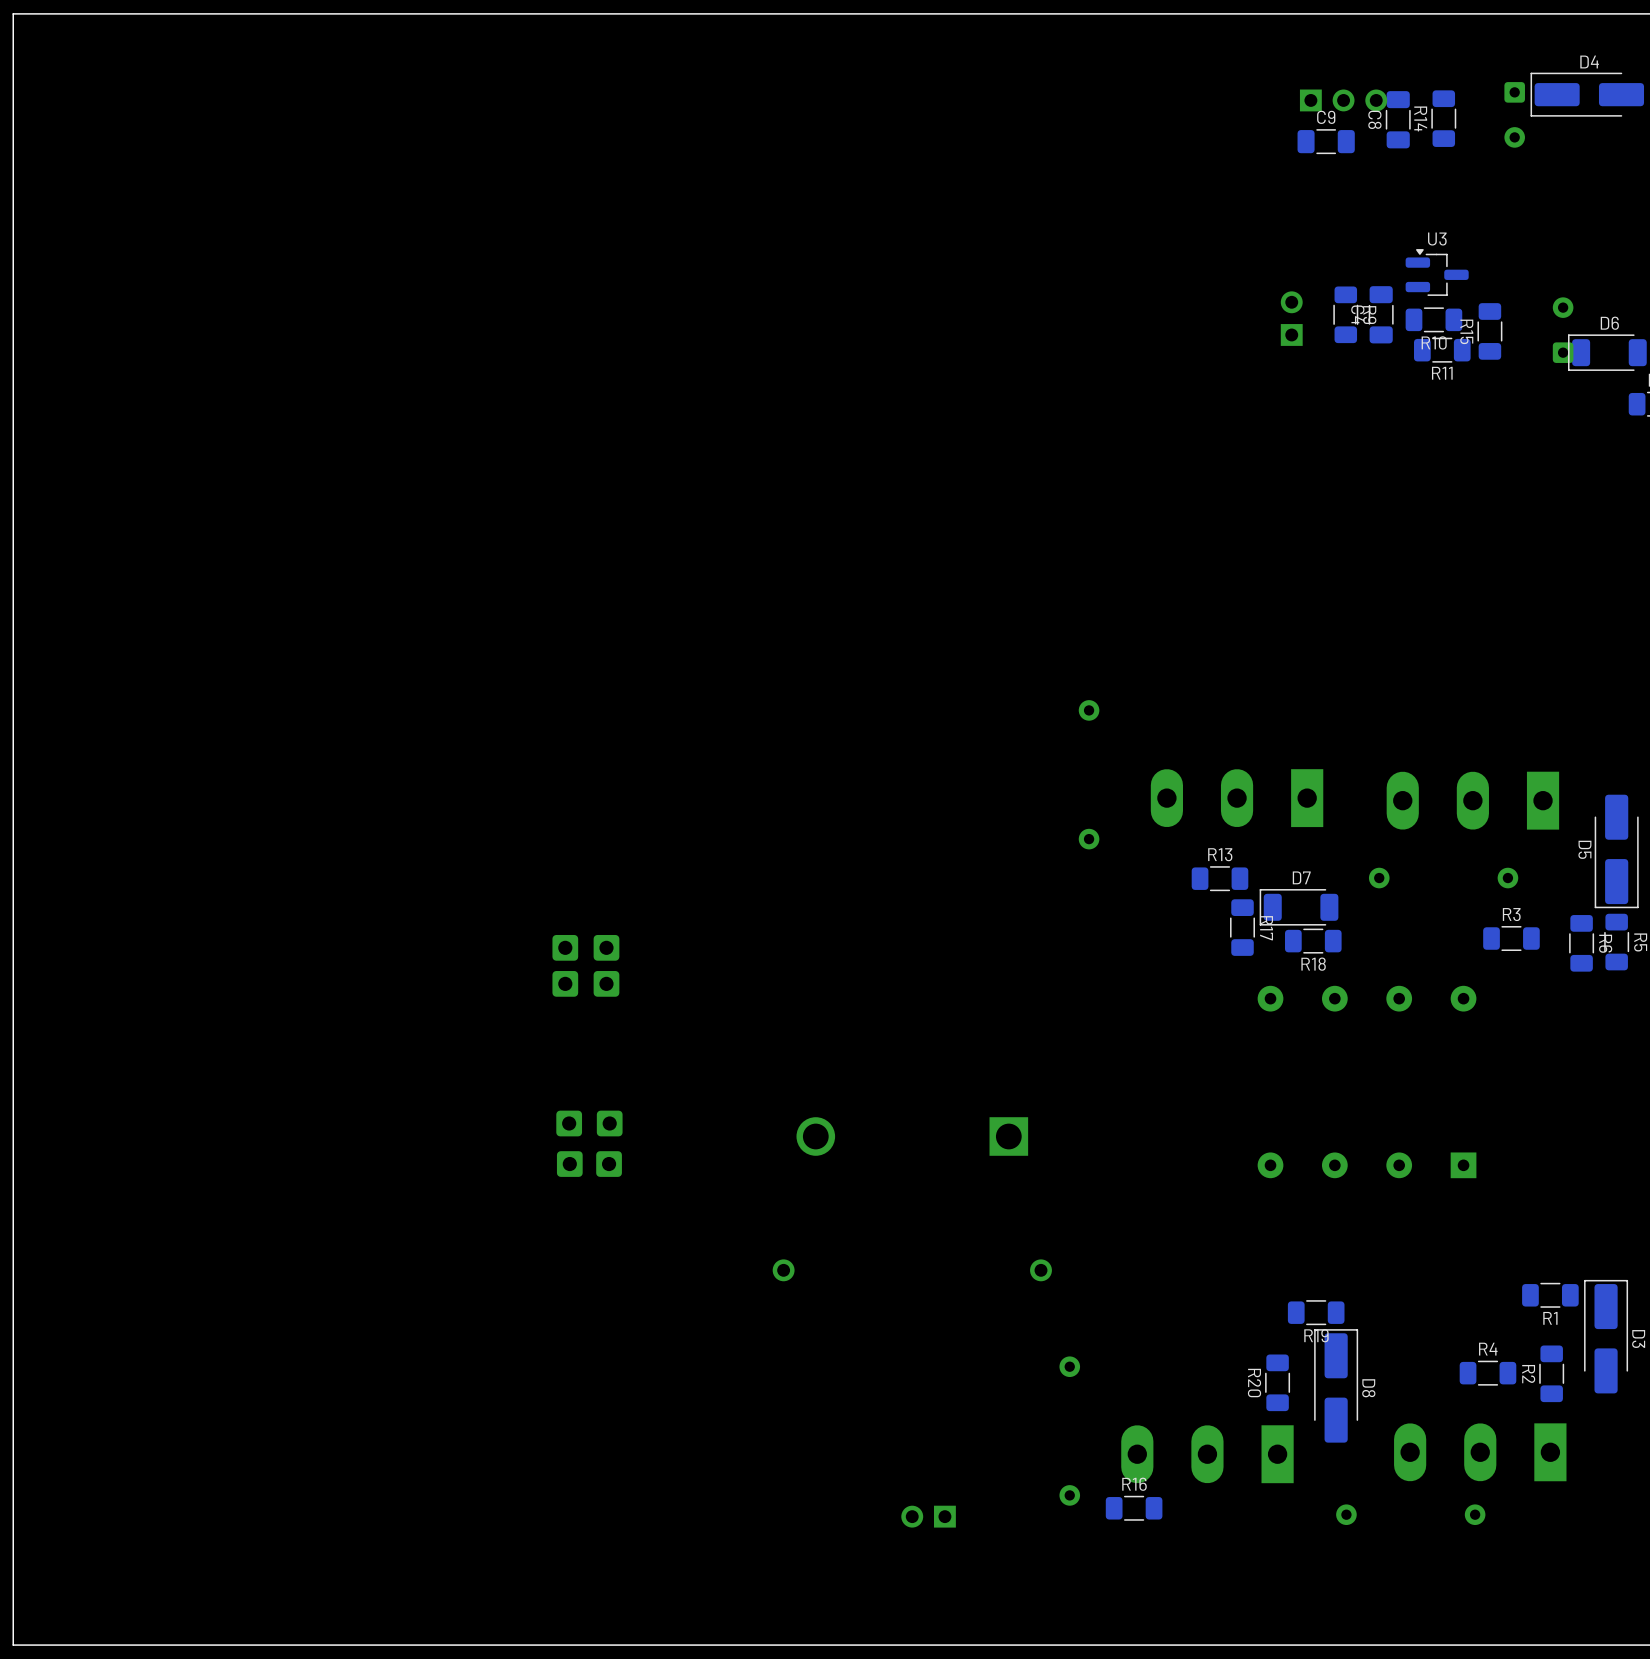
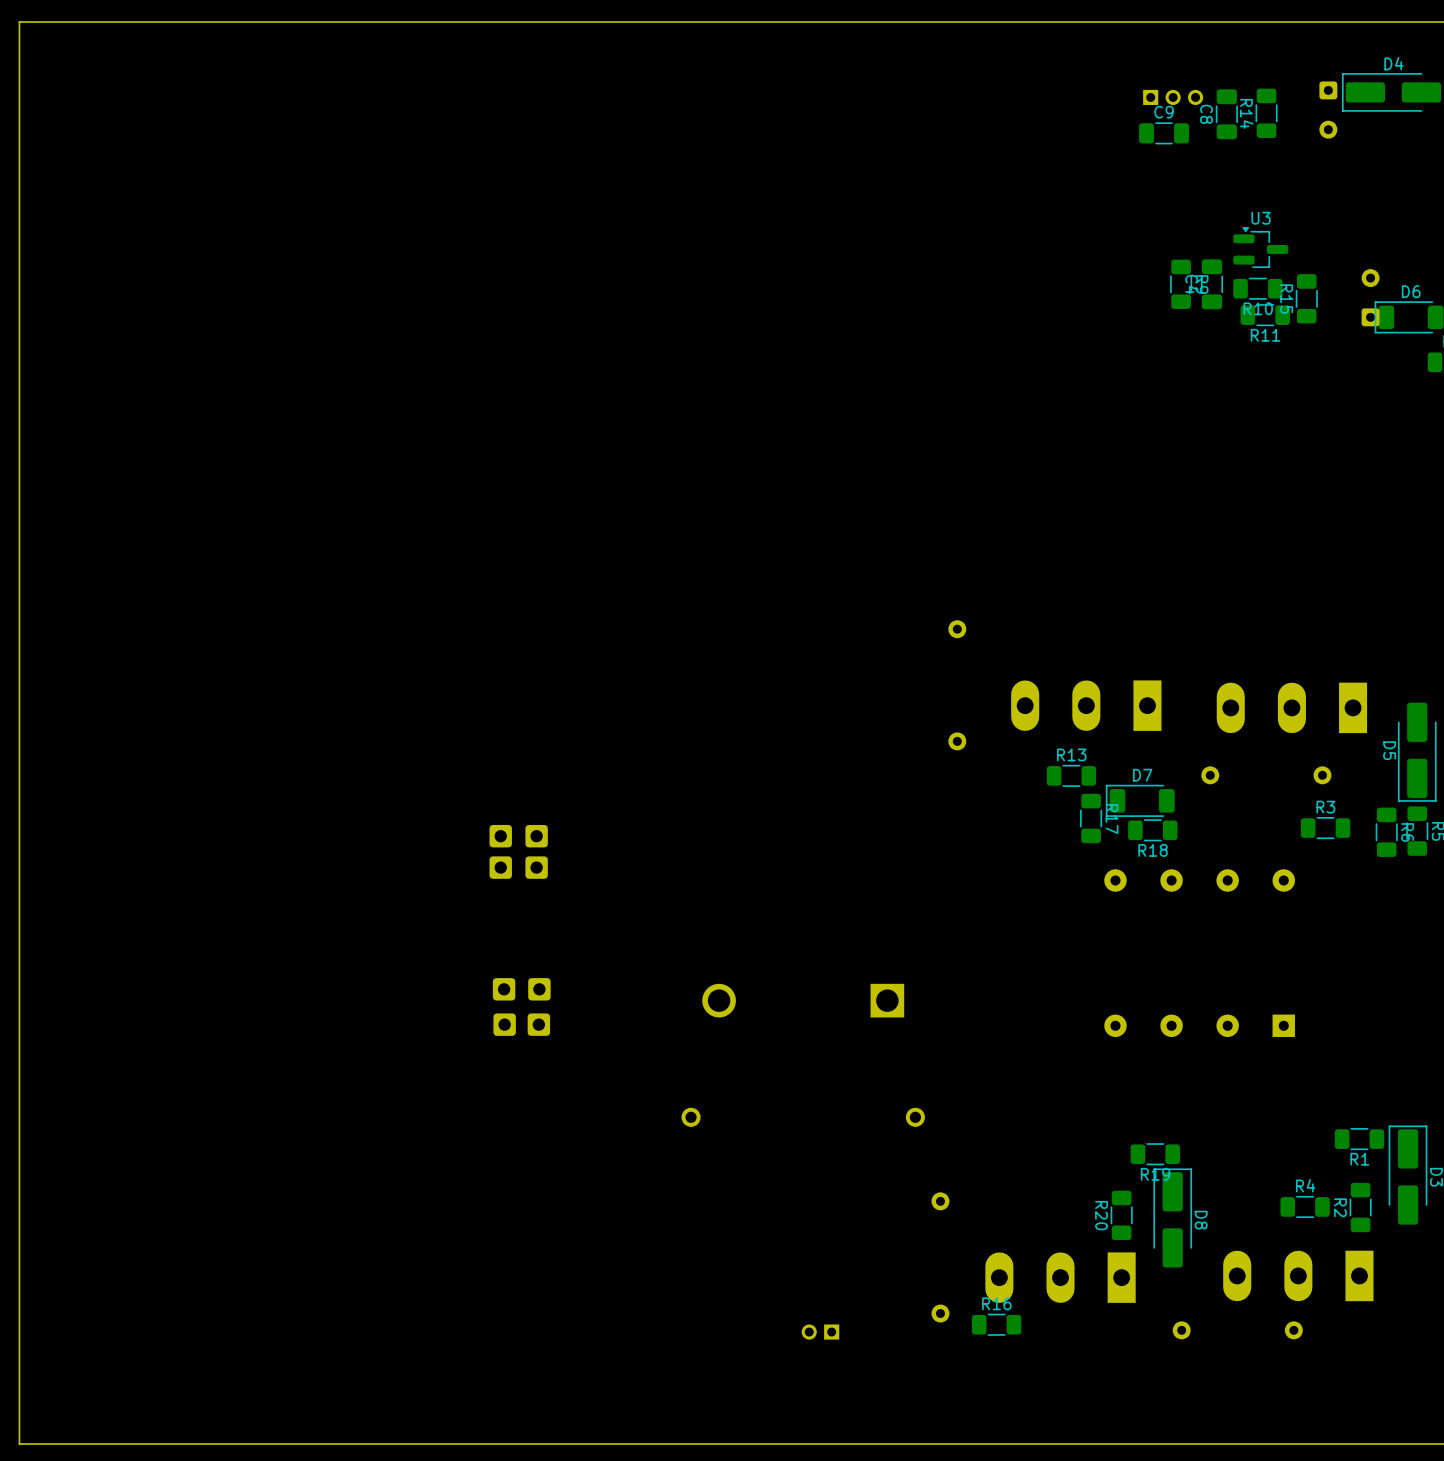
part footprint: [1299, 89, 1388, 112] -> [1143, 89, 1204, 106]
part: (1291, 318) -> none
part footprint: [901, 1505, 956, 1528] -> [801, 1324, 840, 1340]

